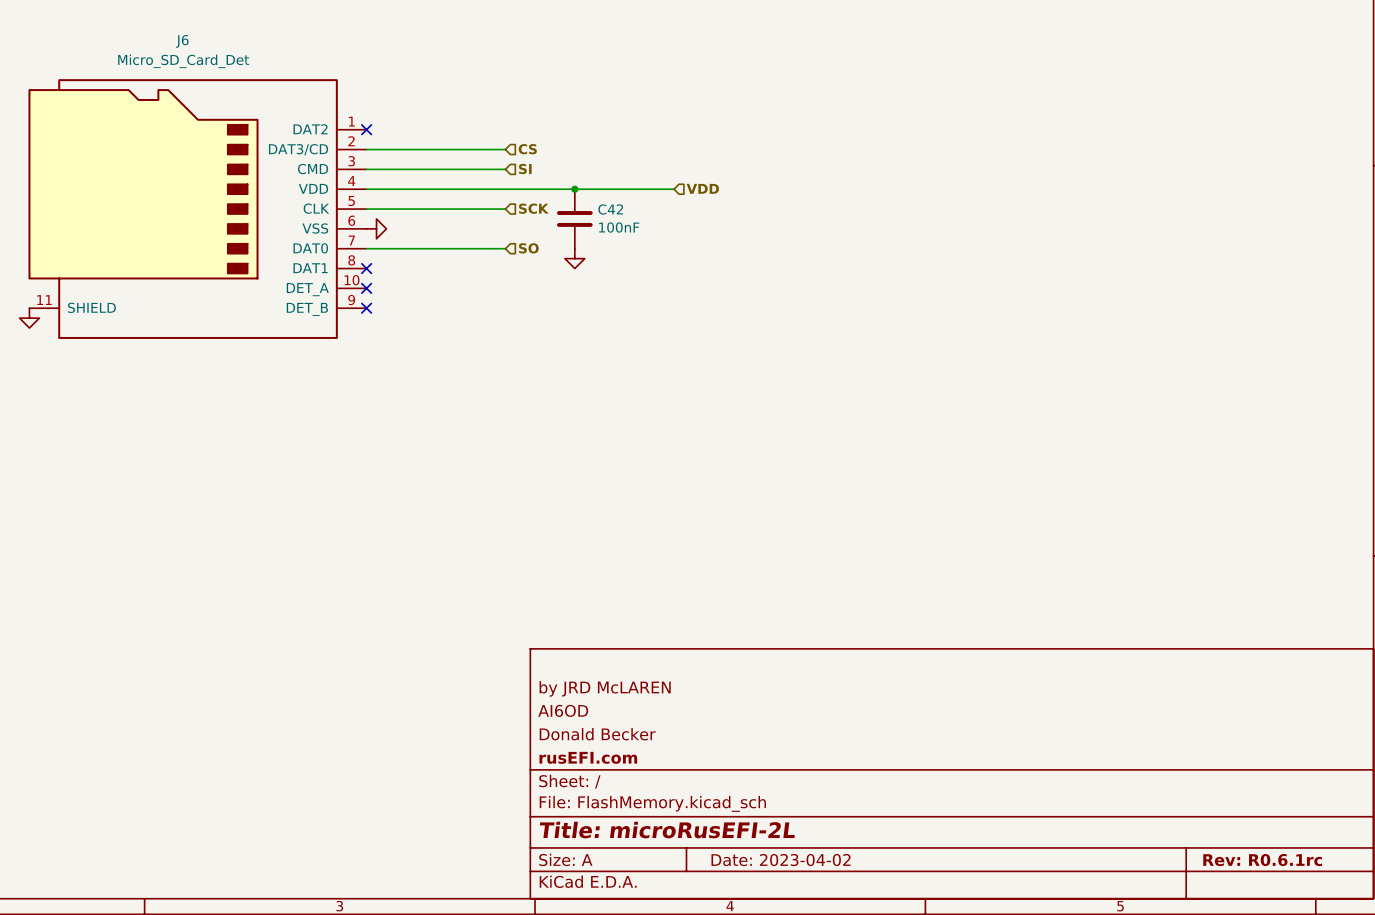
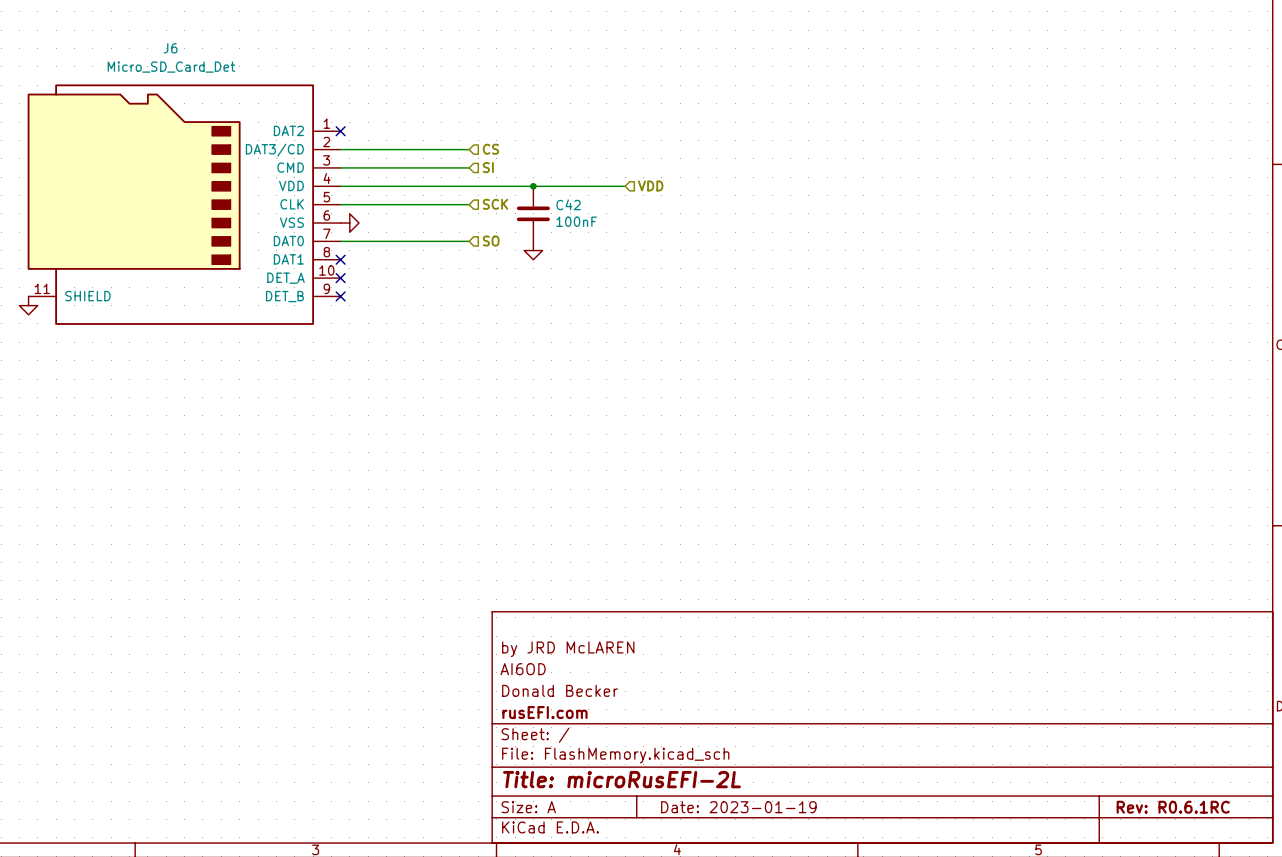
title block: Date: 2023-04-02 (781, 860) -> Date: 2023-01-19 (738, 807)
title block: Rev: R0.6.1rc (1262, 860) -> Rev: R0.6.1RC (1173, 807)

